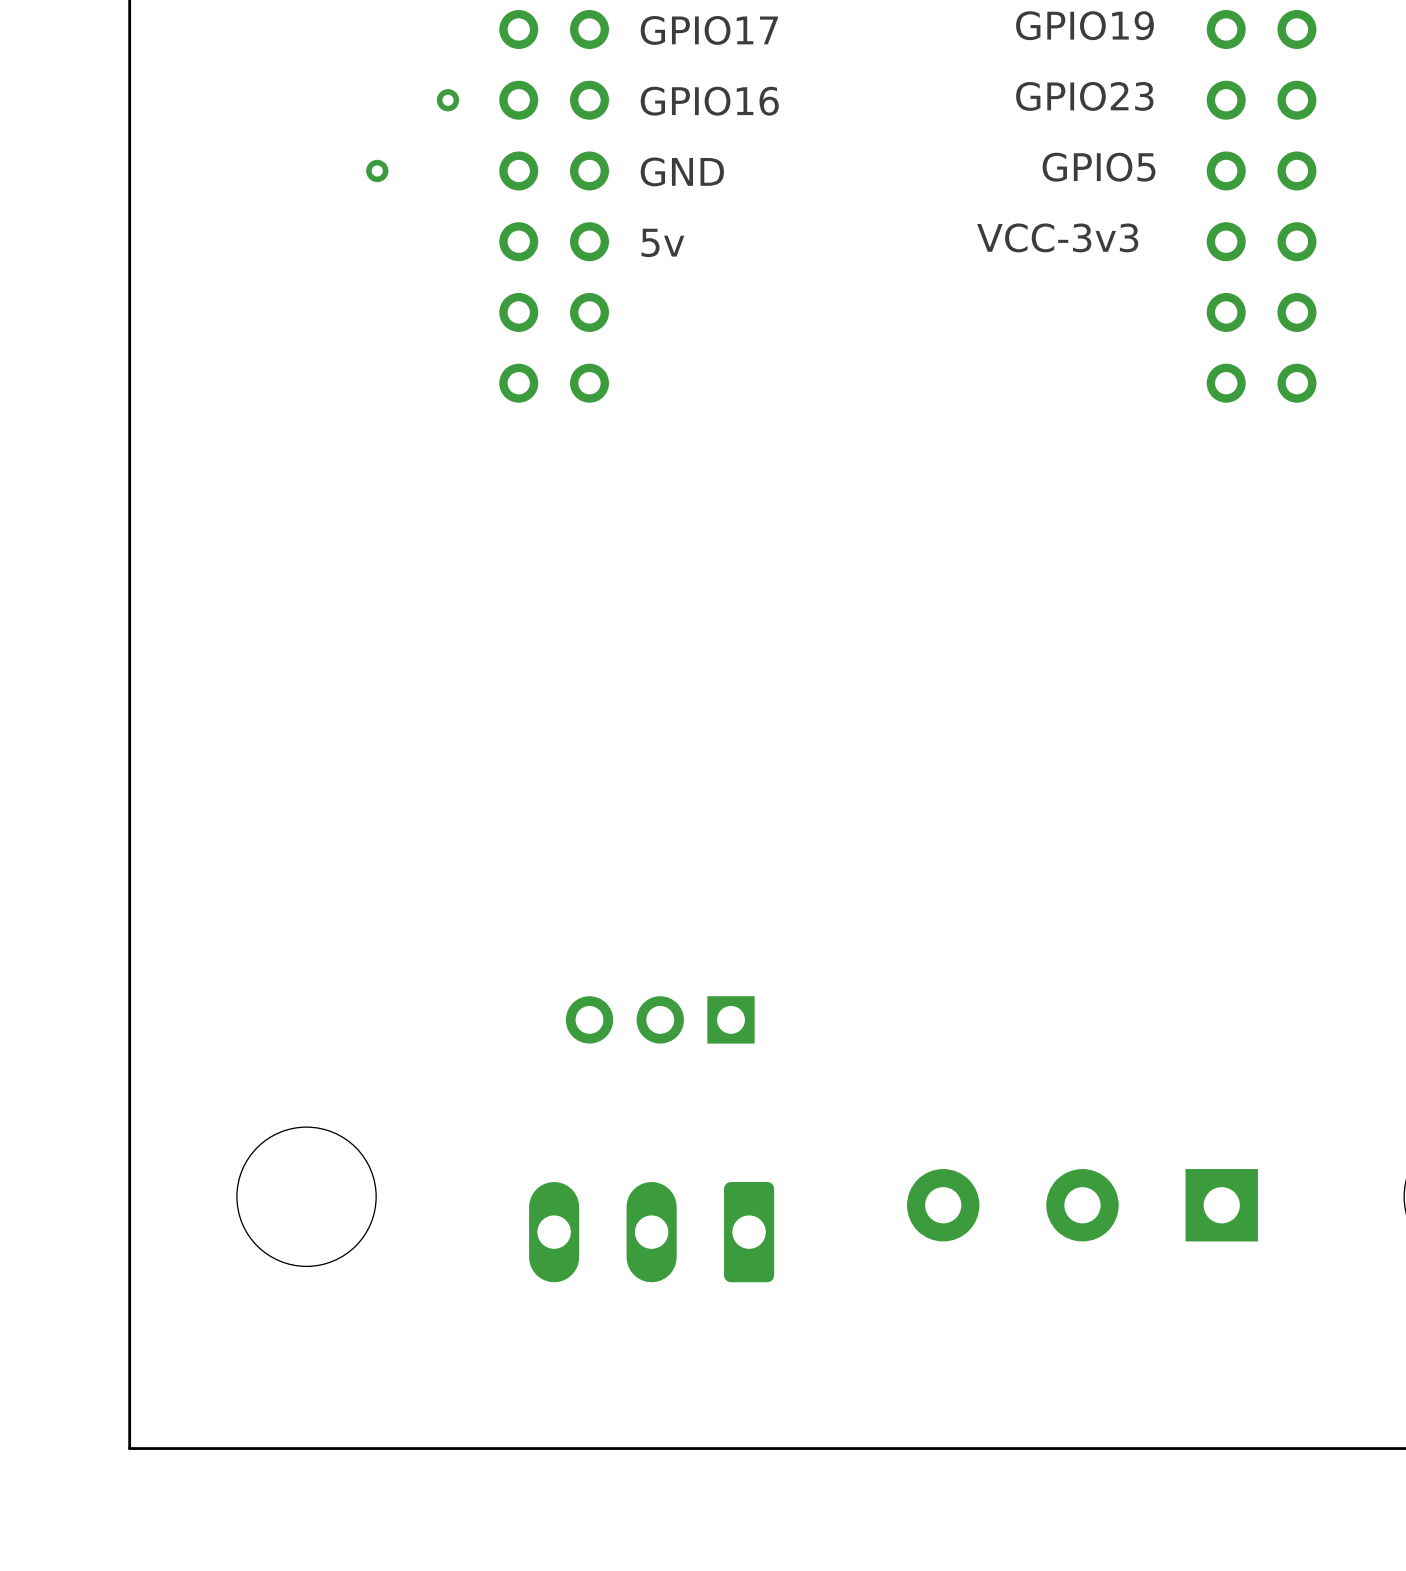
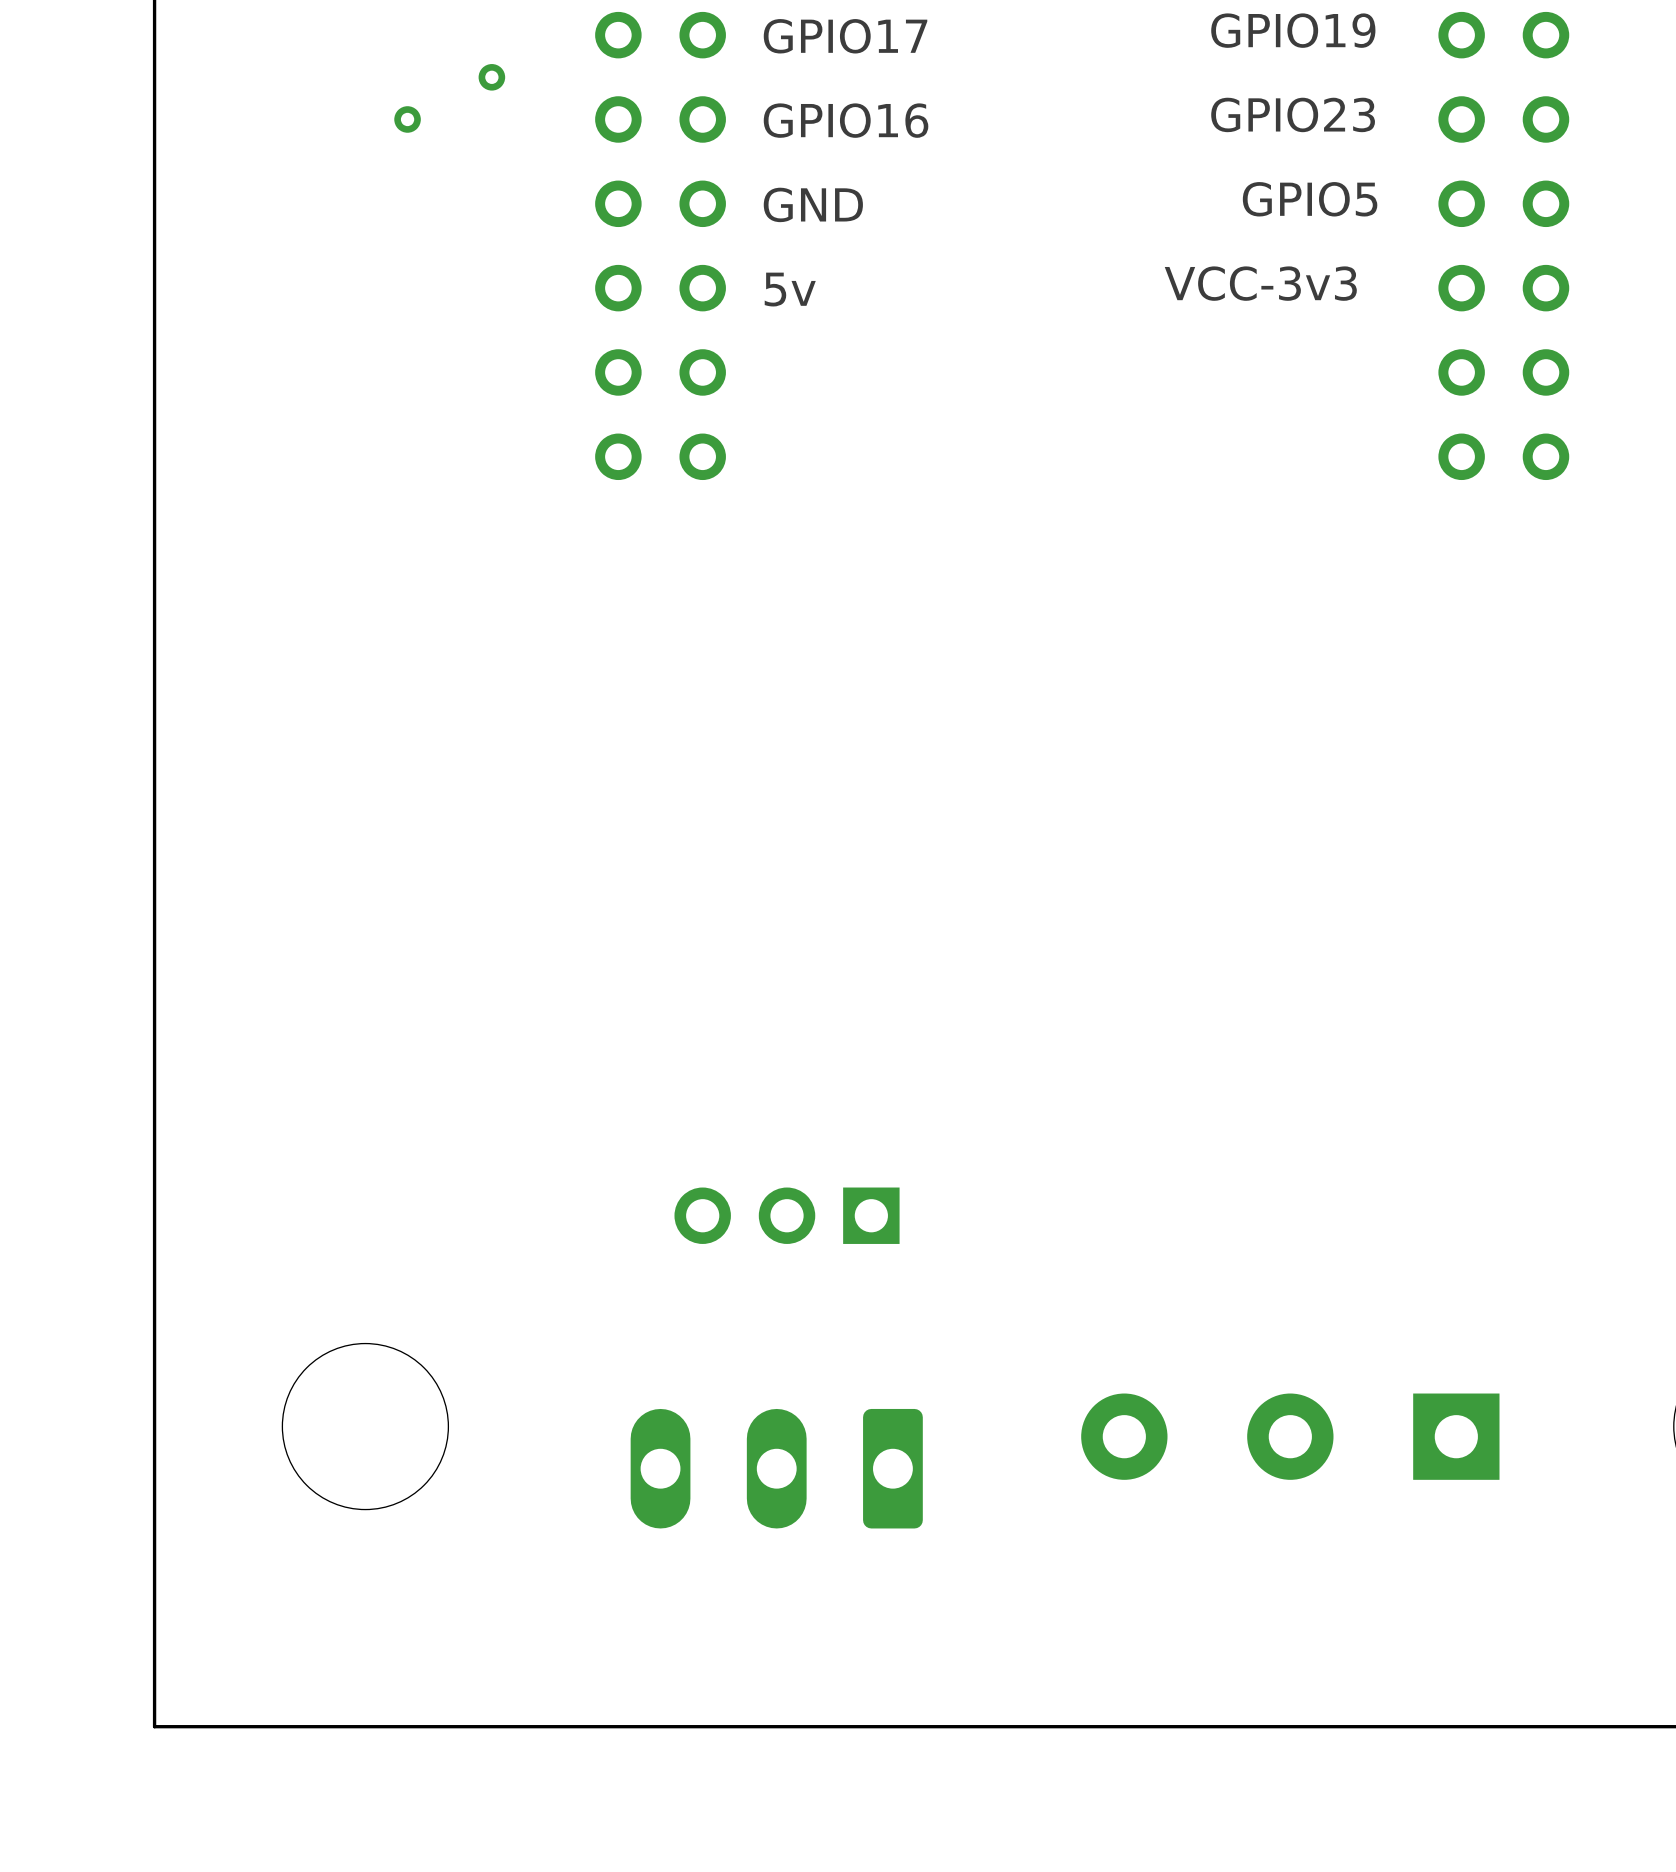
via: none -> (407, 119)
via position: (448, 100) -> (491, 77)
via: (377, 170) -> none

